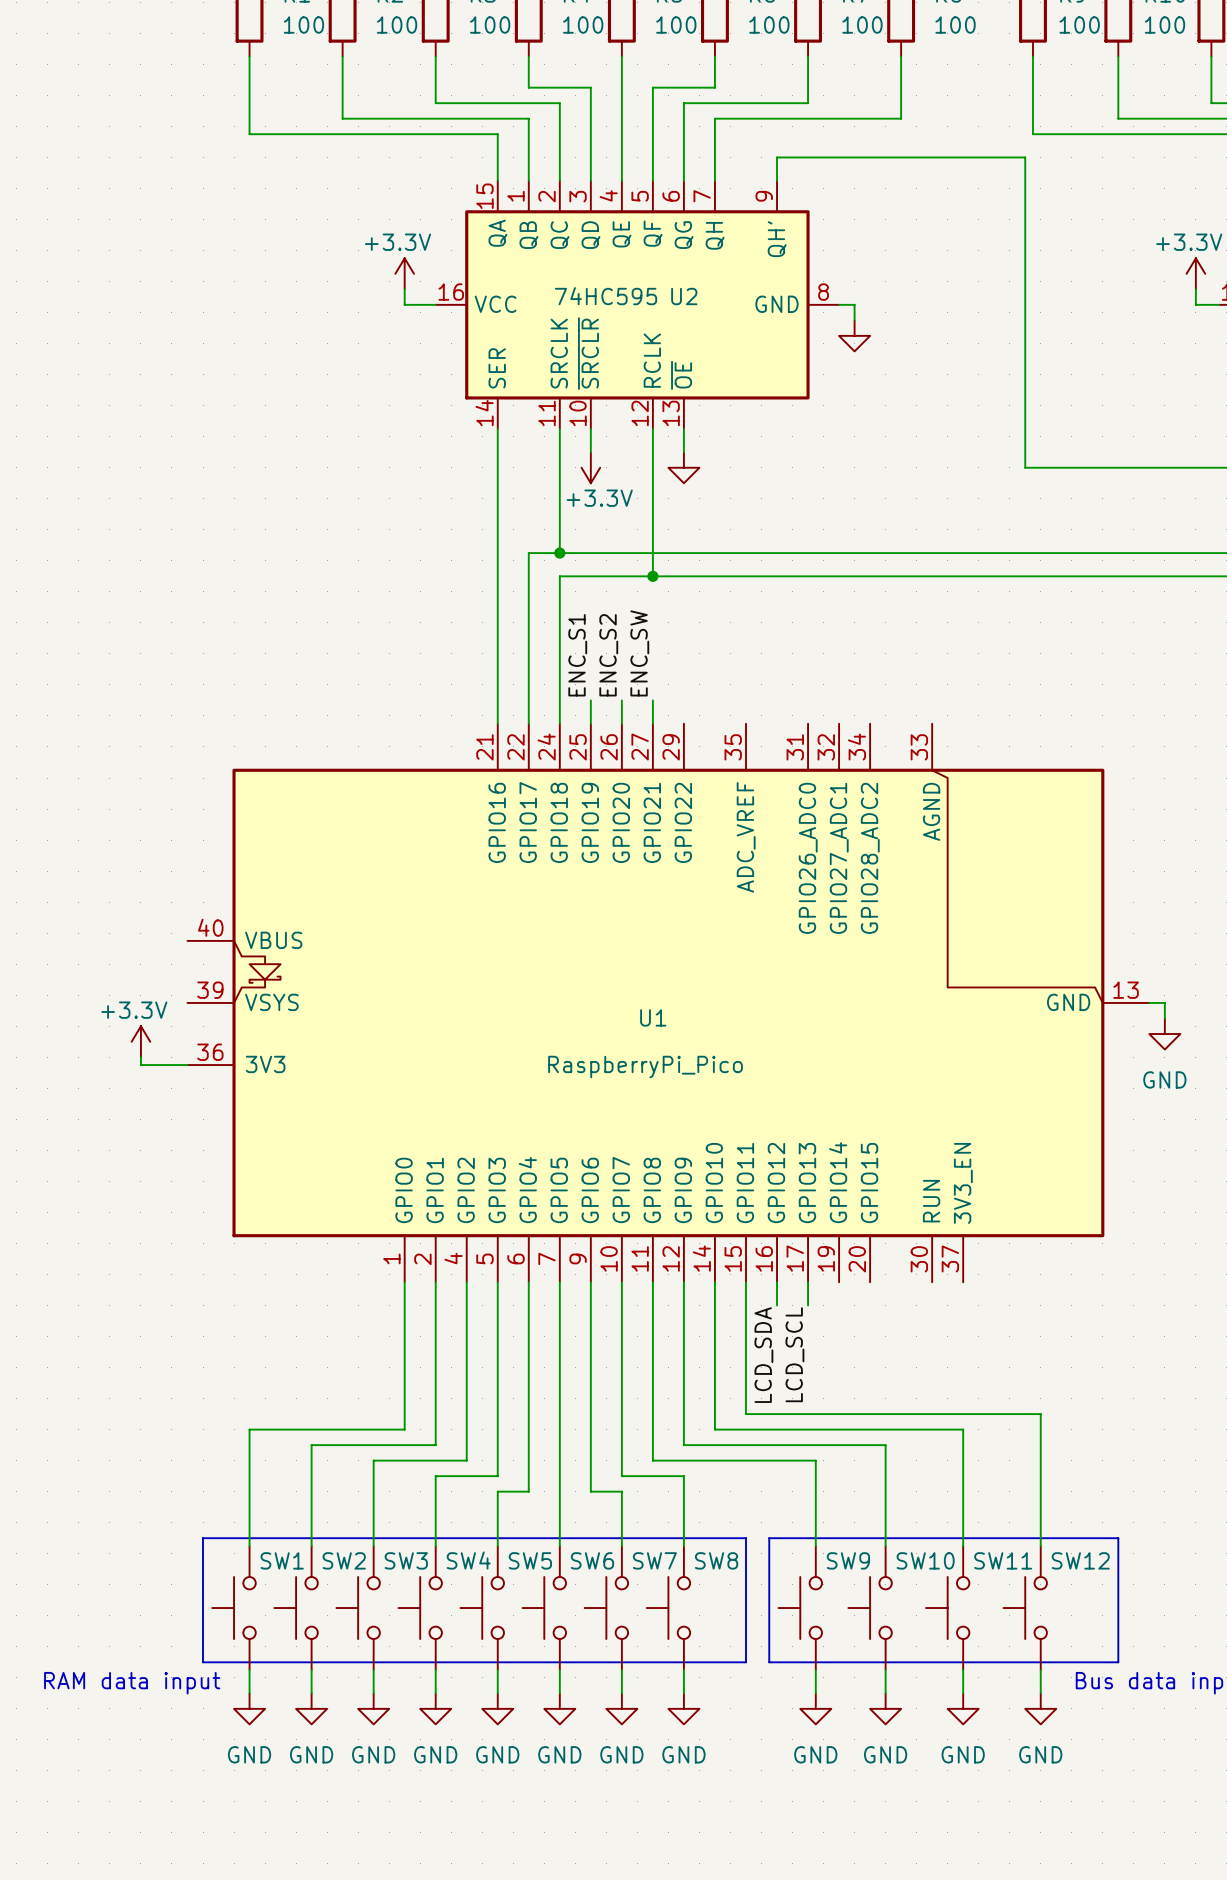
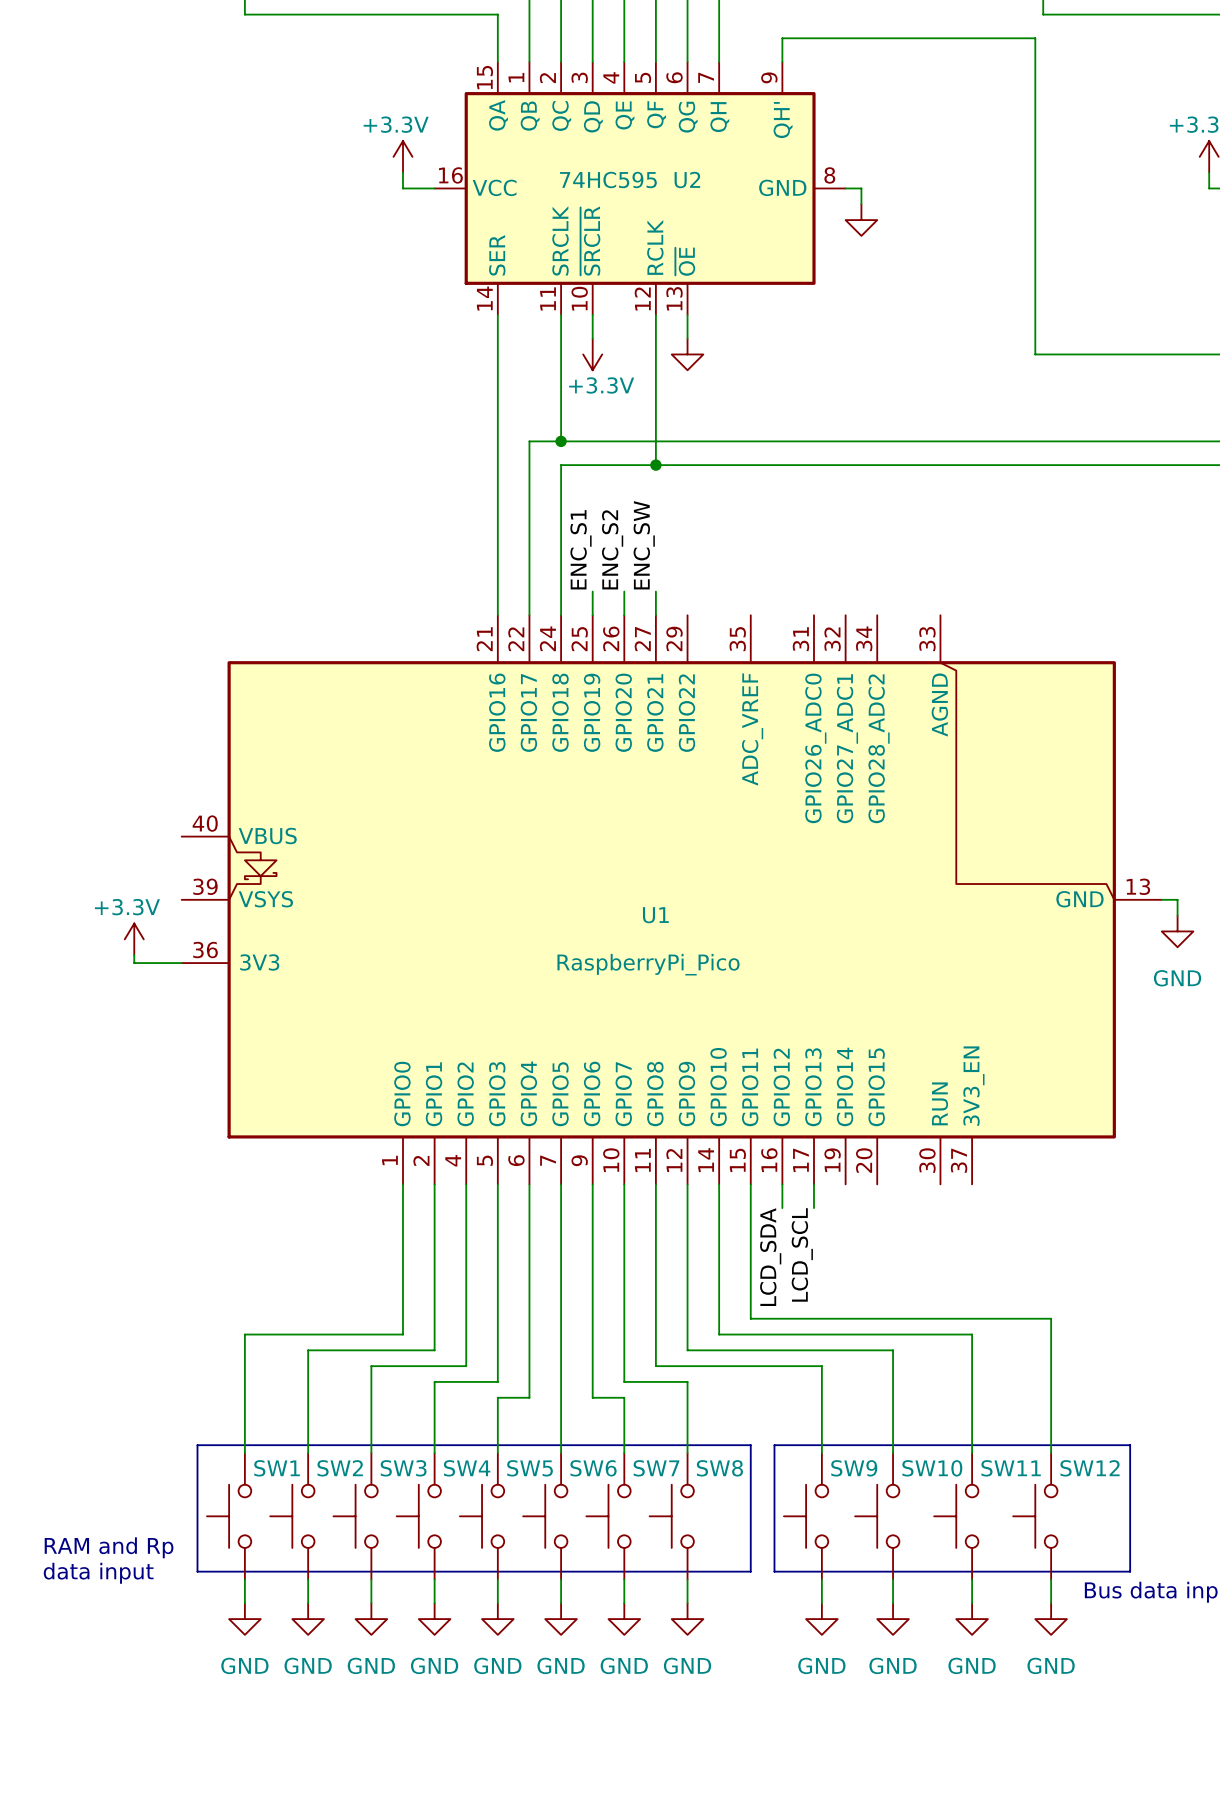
text: none -> RAM and Rp (109, 1547)
text: RAM data input (132, 1683) -> data input (98, 1573)

